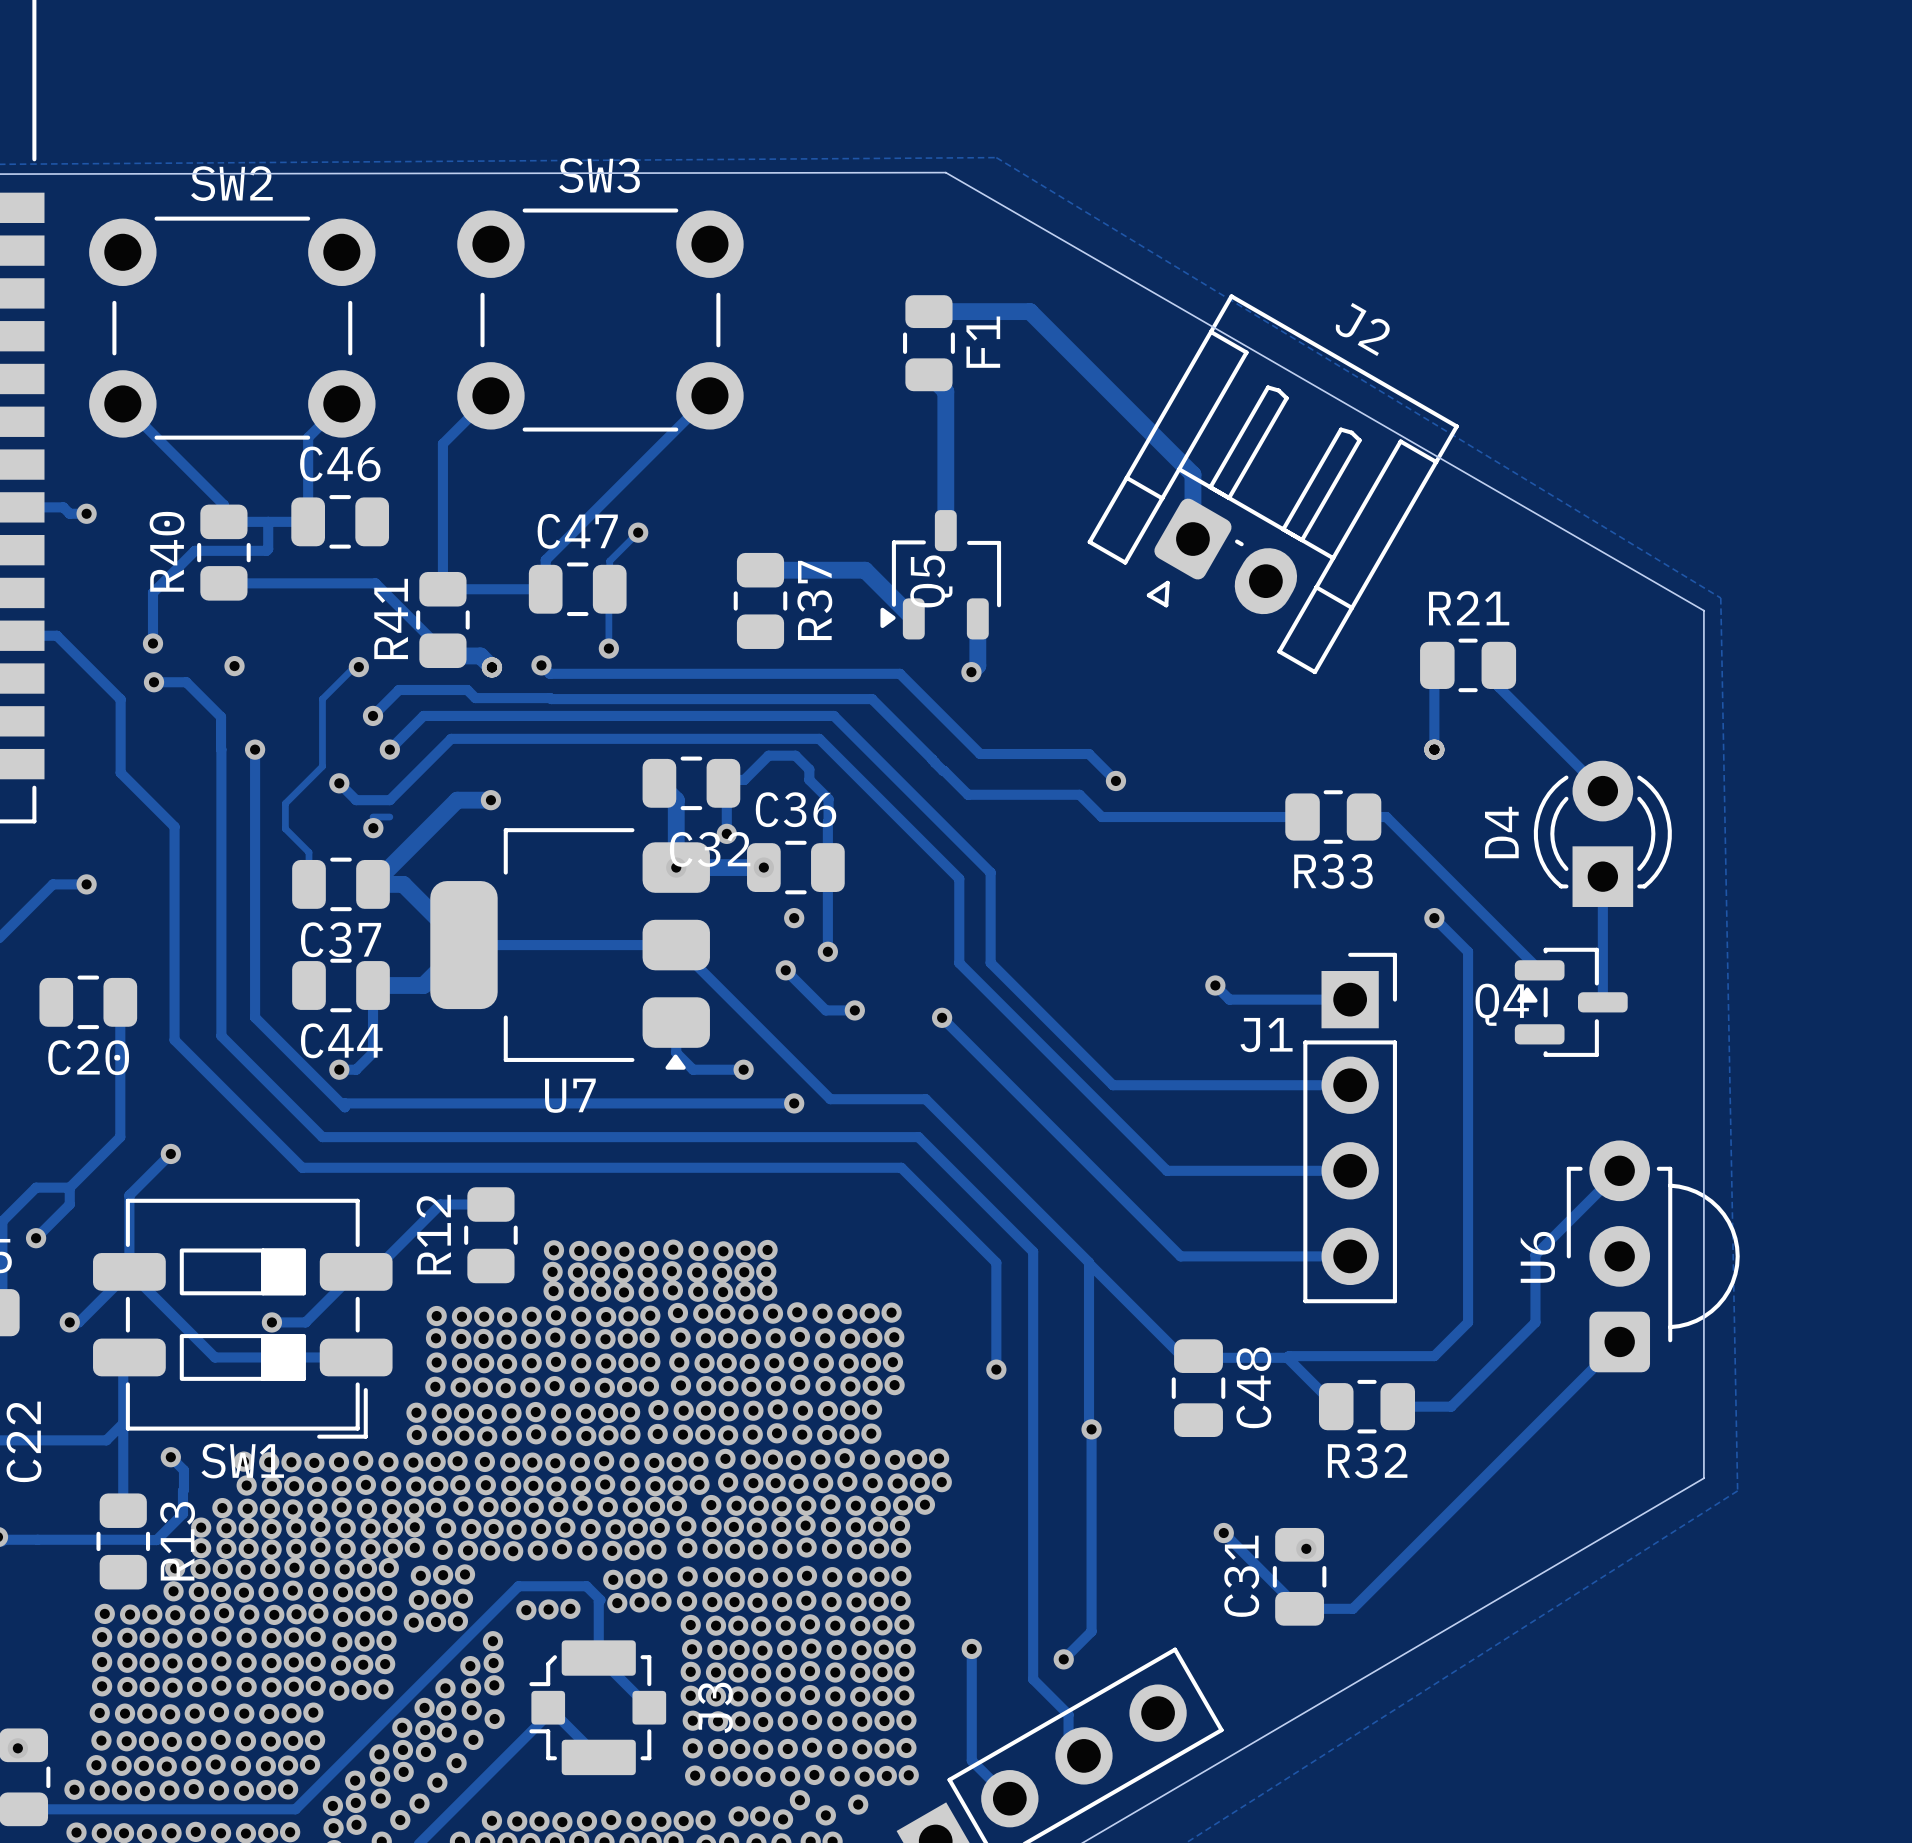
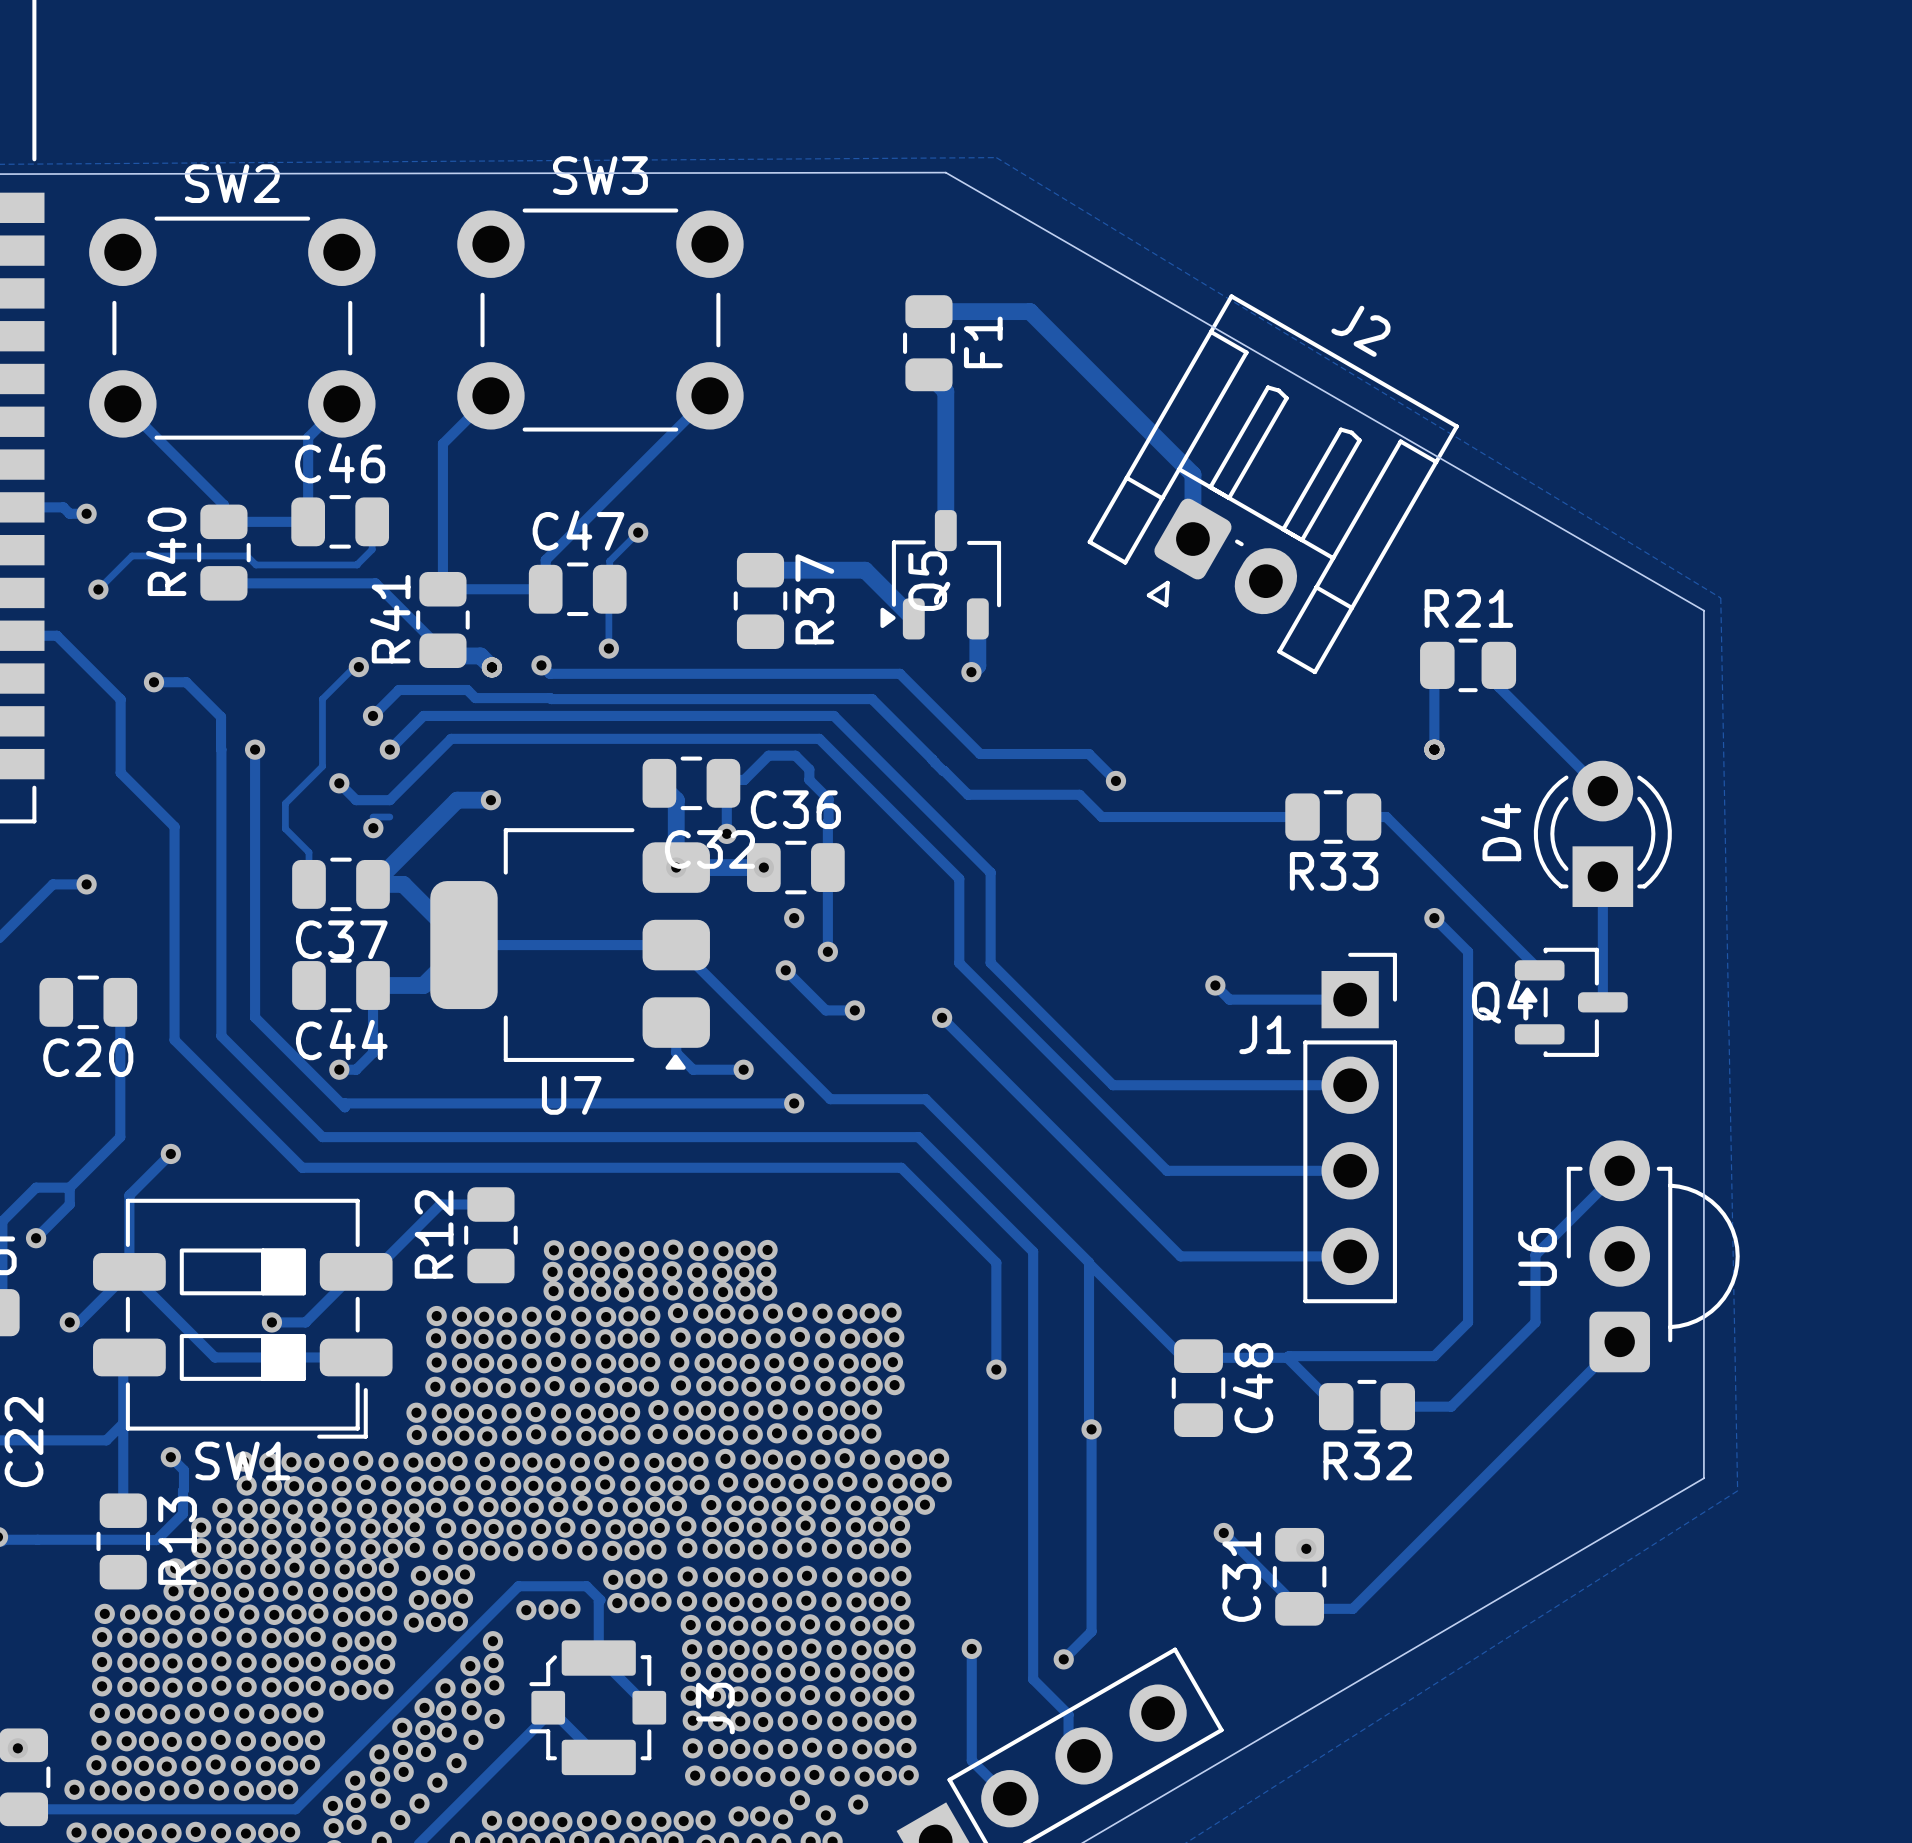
track: (268, 521) (268, 549) (266, 550) (194, 550) (152, 592) (152, 643) -> none
track: none -> (372, 521) (372, 549) (357, 564)
track: none -> (357, 564) (256, 564) (246, 555) (132, 555) (98, 589)
via position: (152, 643) -> (98, 589)
via: (234, 666) -> none

